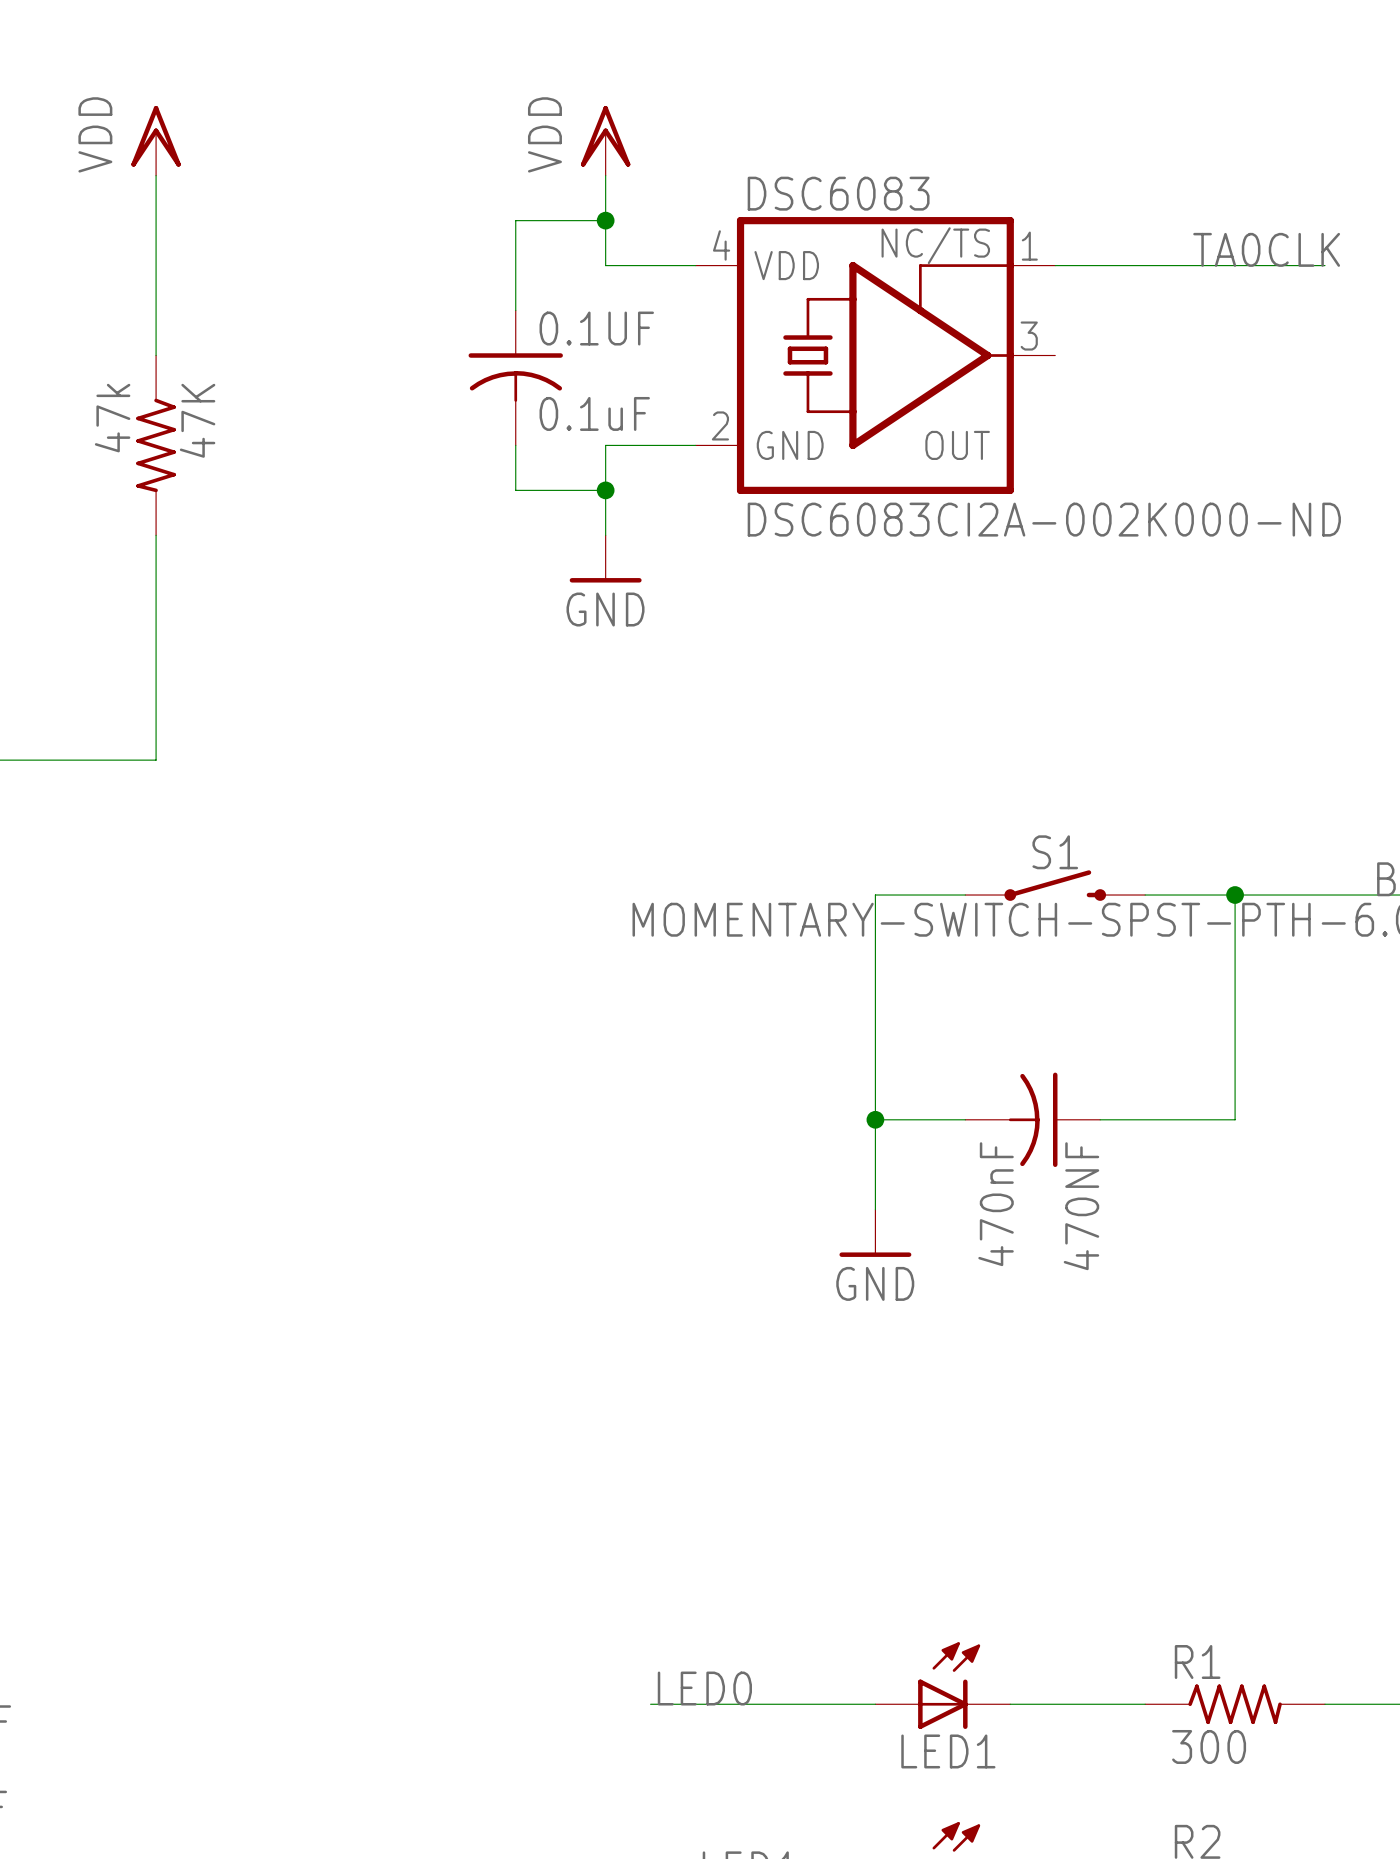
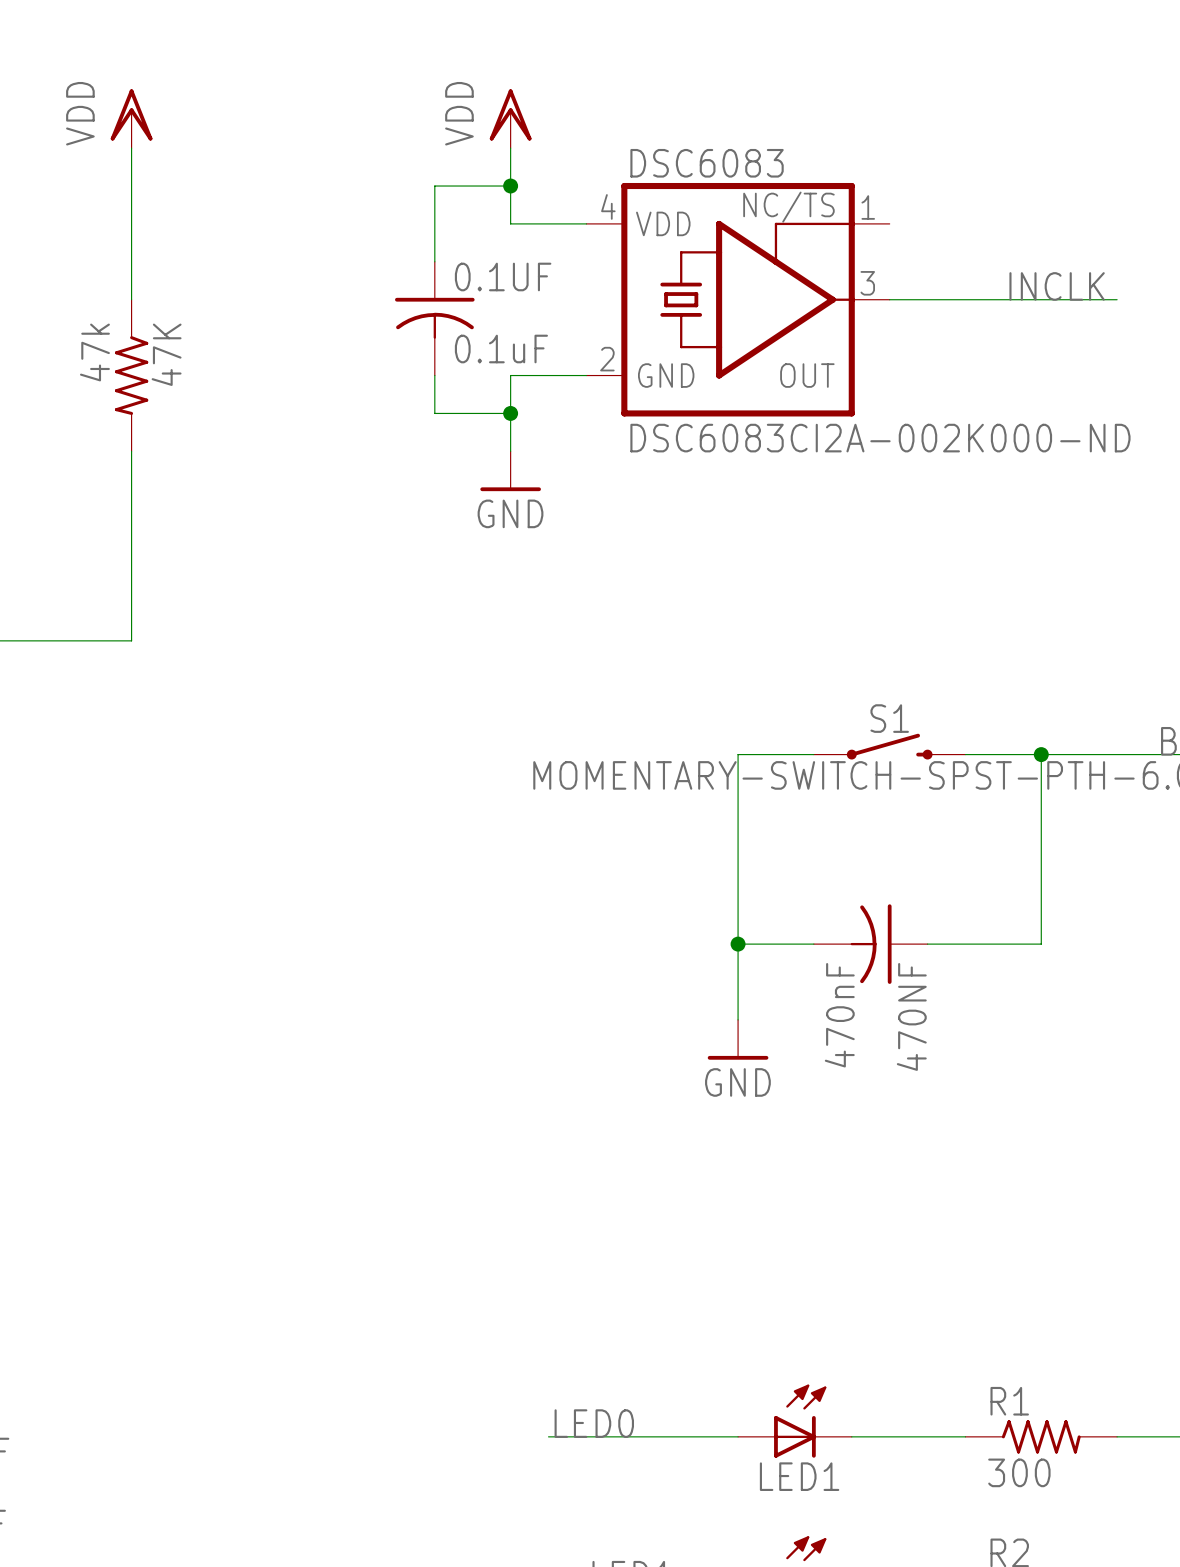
label: TA0CLK (1266, 249) -> none
wire: (1055, 265) (1324, 265) -> (889, 299) (1117, 299)
label: none -> INCLK (1057, 286)

